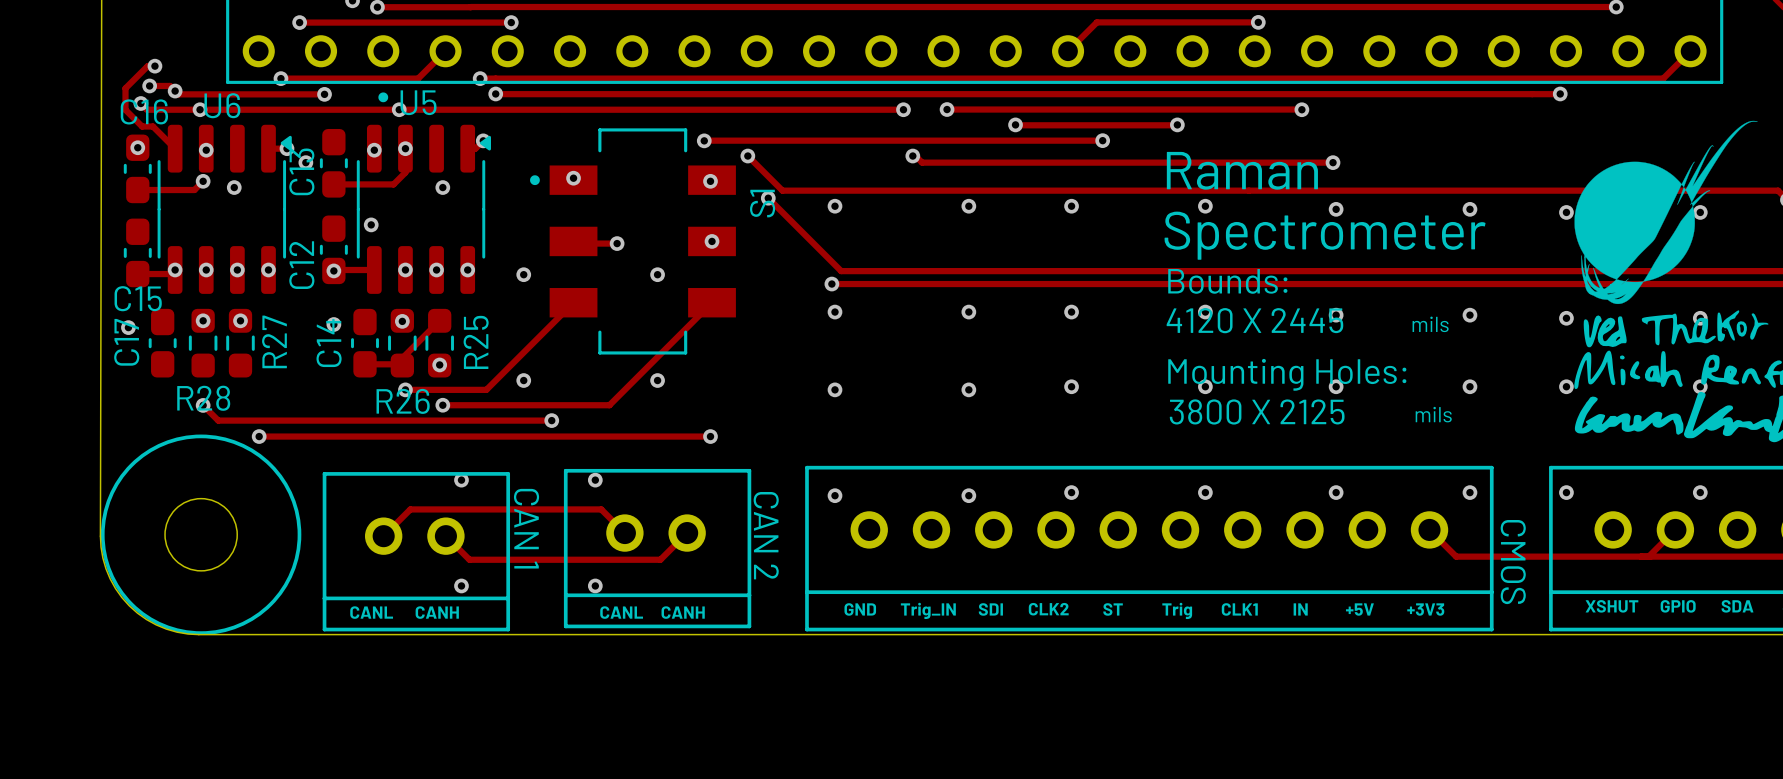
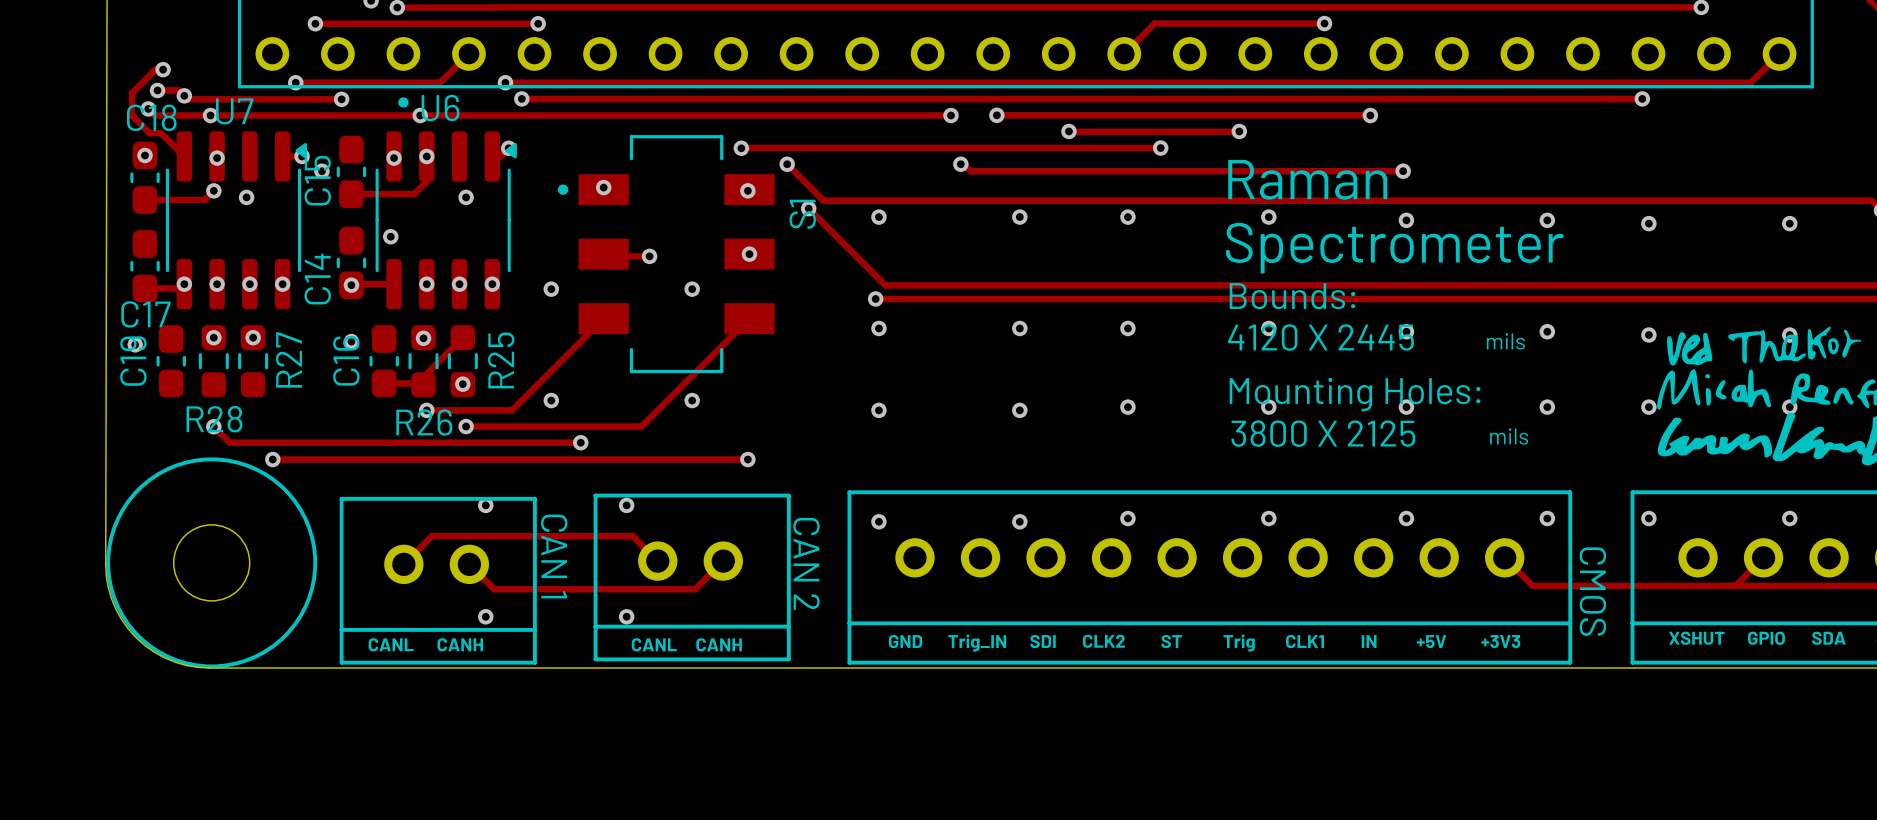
U5 name: U5 (418, 102) -> U6 (440, 107)
U6 name: U6 (222, 105) -> U7 (234, 111)
C16 name: C16 (144, 111) -> C18 (151, 117)
drawing: [1574, 120, 1758, 305] -> none
C13 name: C13 (301, 171) -> C15 (317, 180)
C12 name: C12 (301, 265) -> C14 (317, 279)
C15 name: C15 (138, 298) -> C17 (145, 314)
C17 name: C17 (126, 342) -> C19 (133, 361)
C14 name: C14 (329, 342) -> C16 (346, 360)

